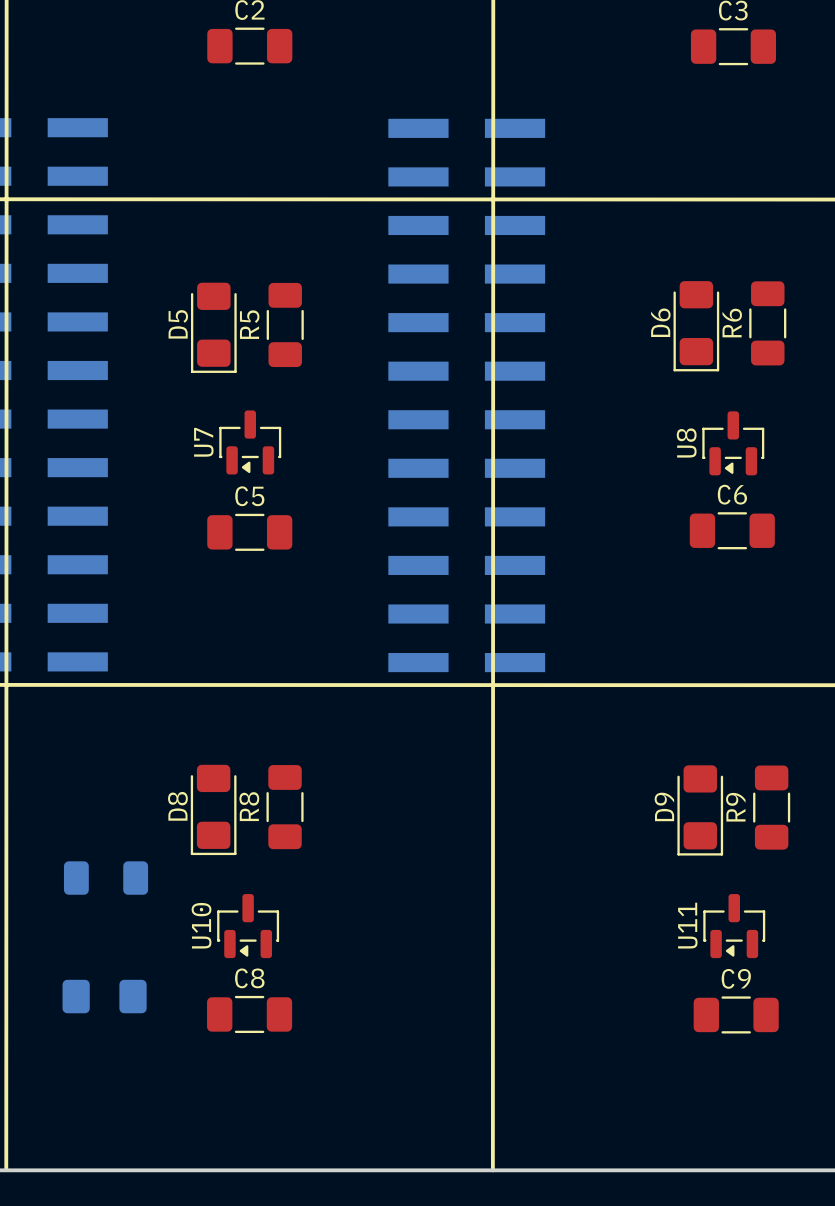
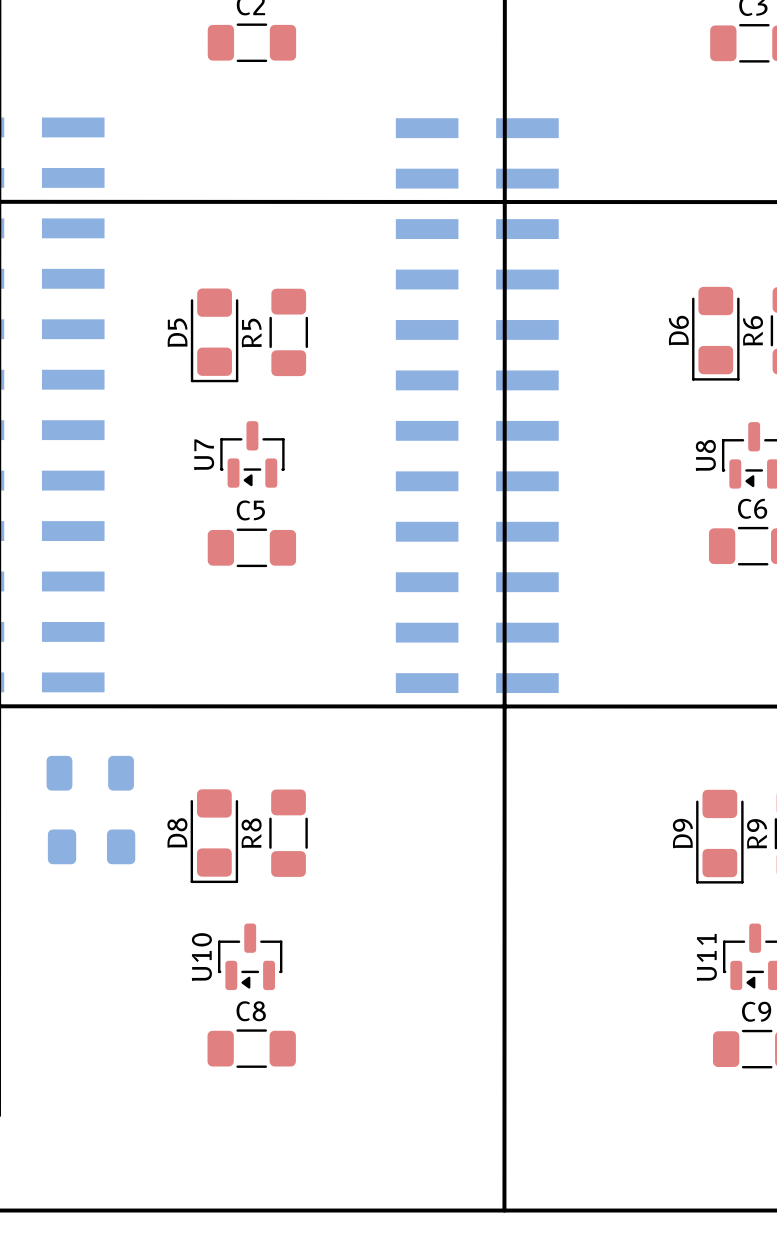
part position: (106, 878) -> (90, 773)
part position: (104, 996) -> (91, 846)

